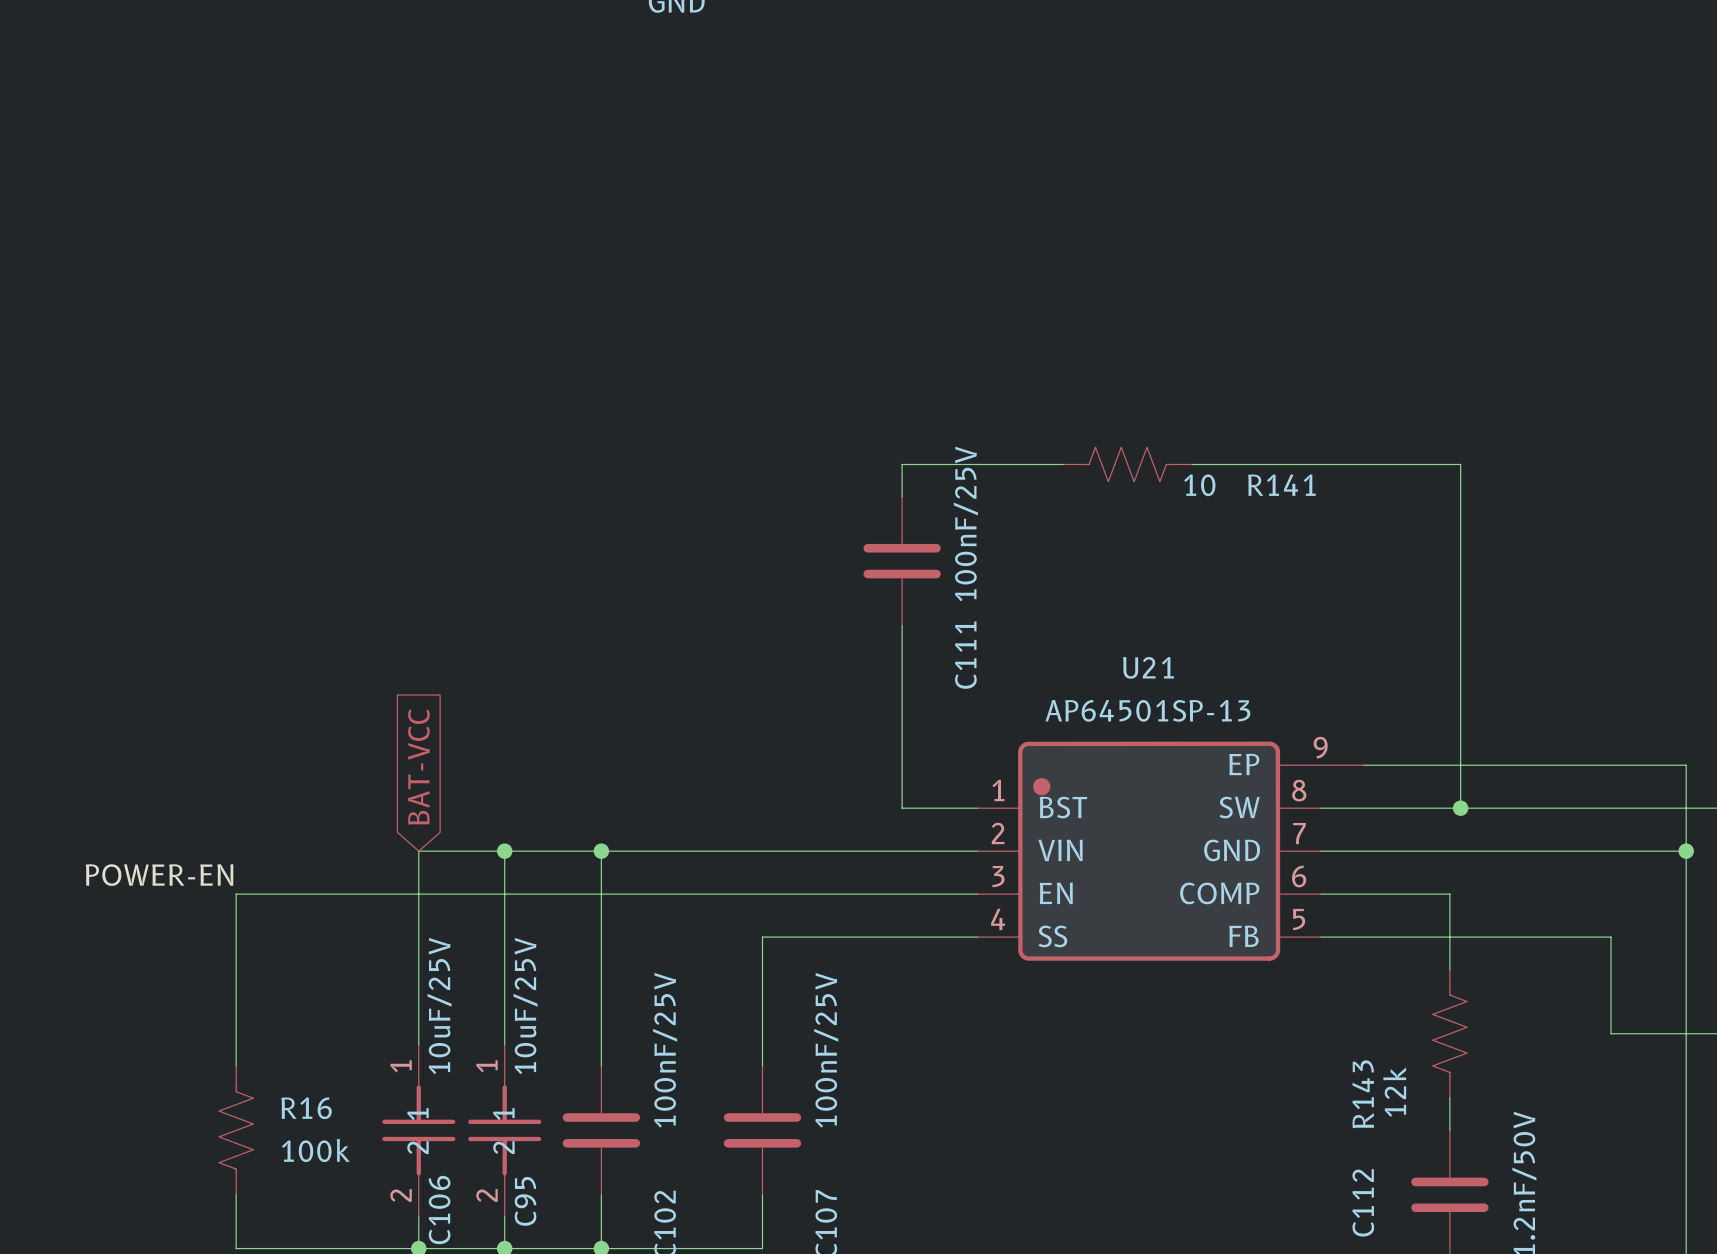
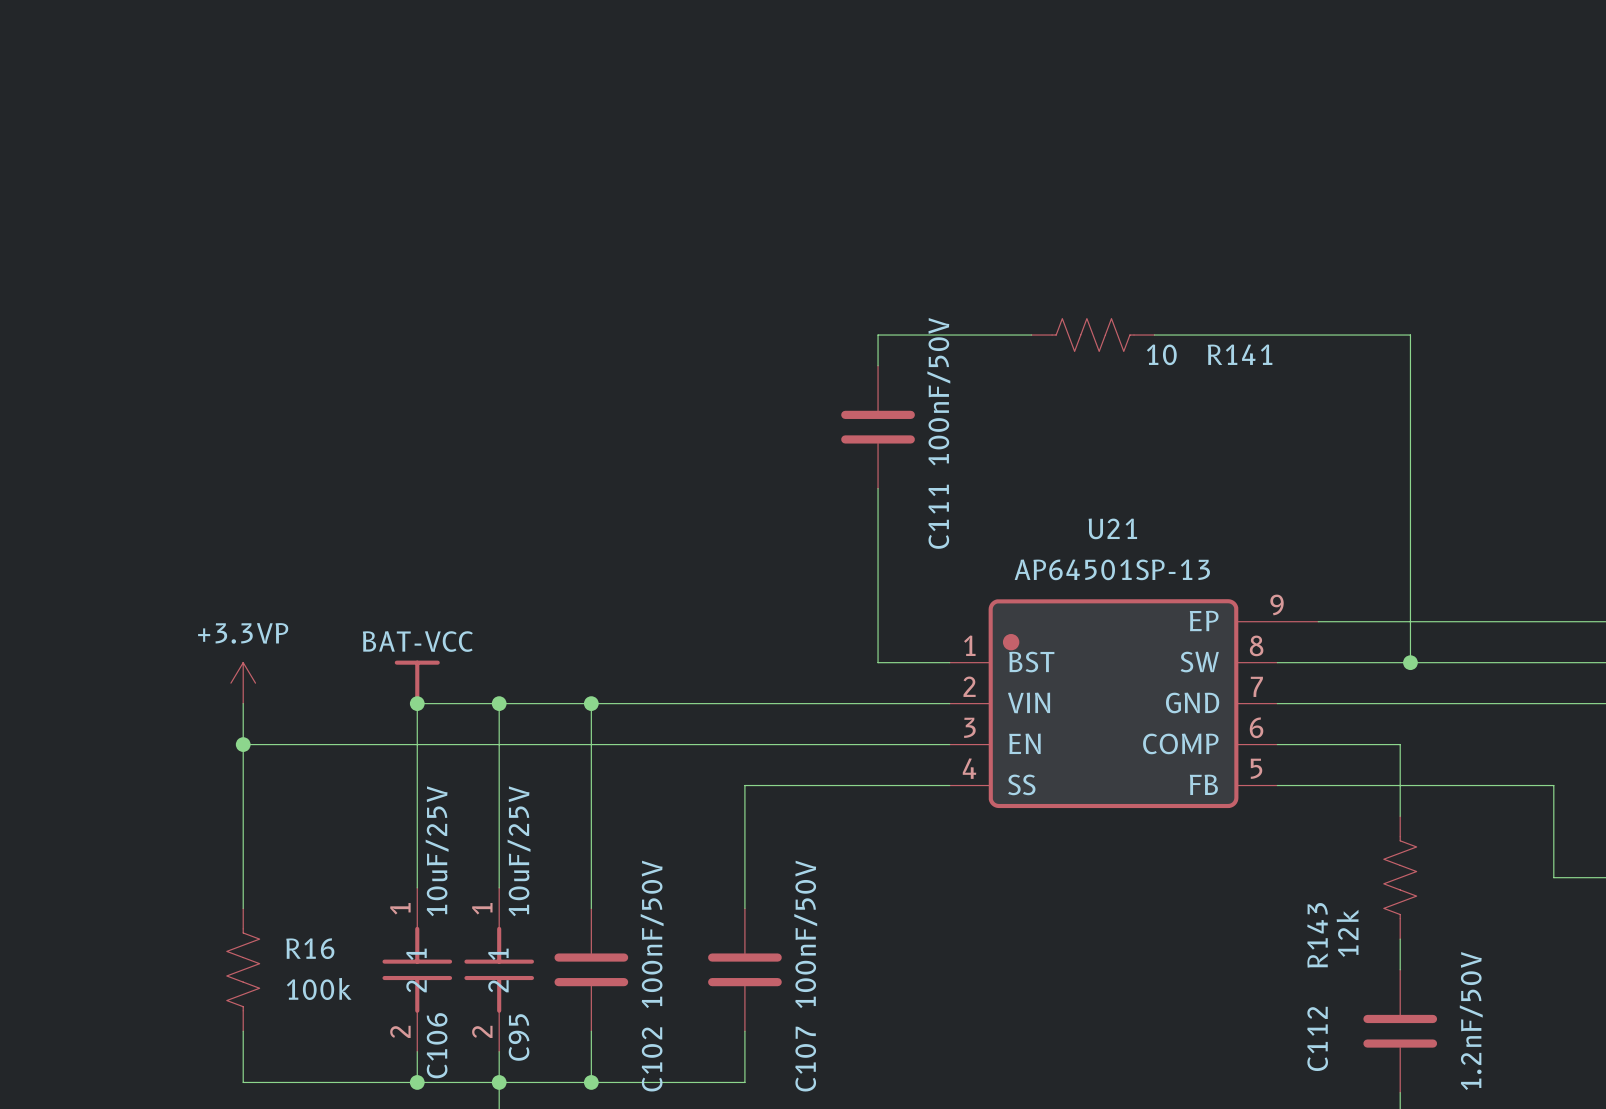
C111 value: 100nF/25V (965, 524) -> 100nF/50V (938, 391)
global label: BAT-VCC (418, 767) -> none
power symbol: none -> +3.3VP (243, 683)
power symbol: none -> BAT-VCC (417, 683)
wire: none -> (243, 703) (243, 744)
junction: none -> (417, 703)
label: POWER-EN (159, 875) -> none
junction: none -> (243, 744)
C102 value: 100nF/25V (665, 1050) -> 100nF/50V (652, 934)
C107 value: 100nF/25V (826, 1050) -> 100nF/50V (805, 934)

